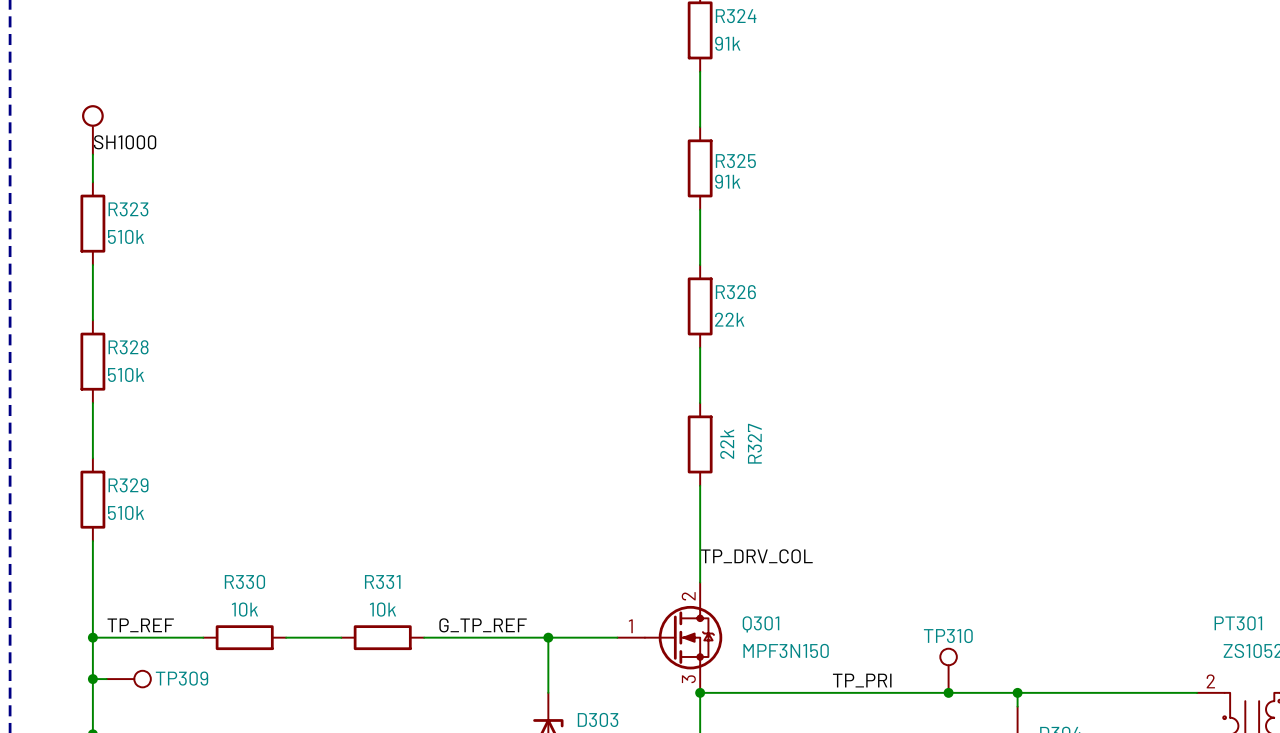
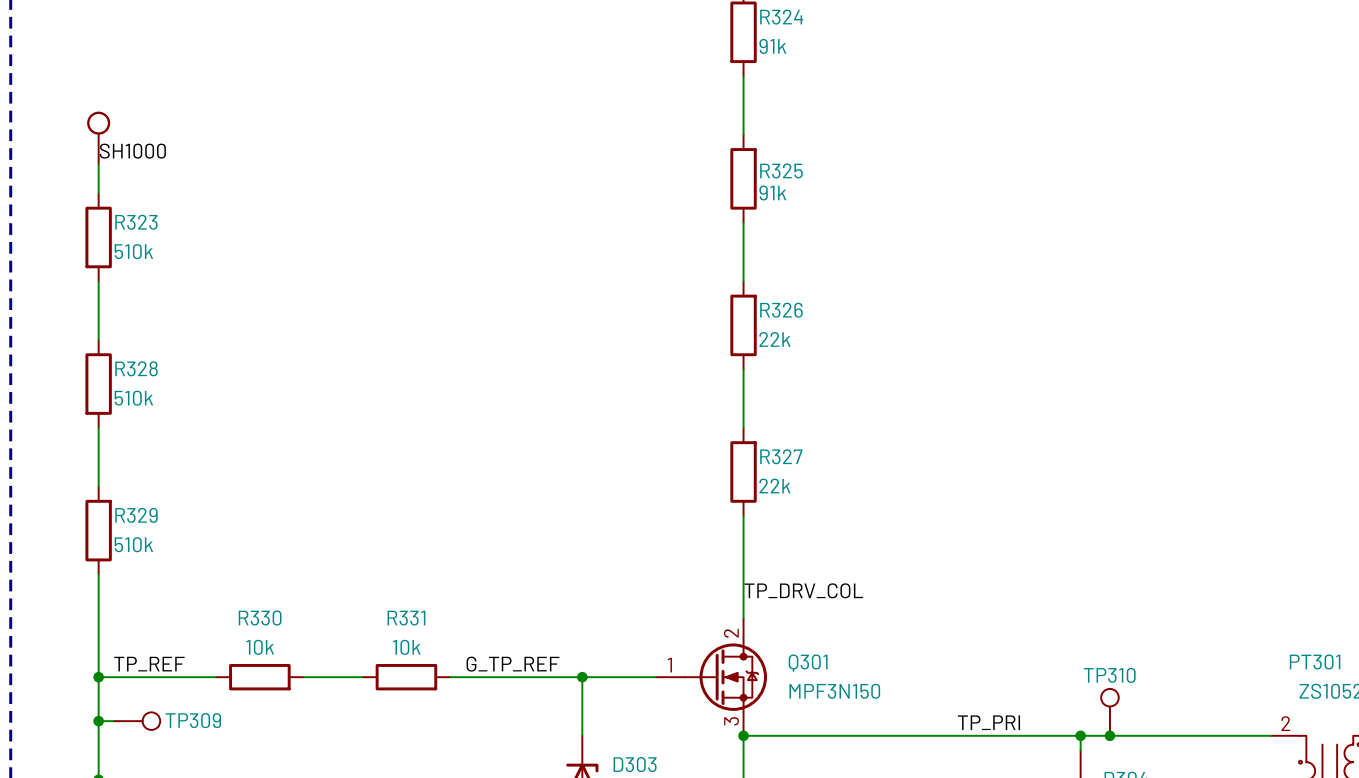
R327 name rotation: 0° (754, 443) -> 90° clockwise (781, 456)
R327 value rotation: 0° (727, 444) -> 90° clockwise (774, 486)
TP310 position: (948, 670) -> (1109, 712)
label position: TP_PRI (862, 680) -> TP_PRI (988, 722)
junction: (948, 692) -> none
junction: none -> (1109, 735)

